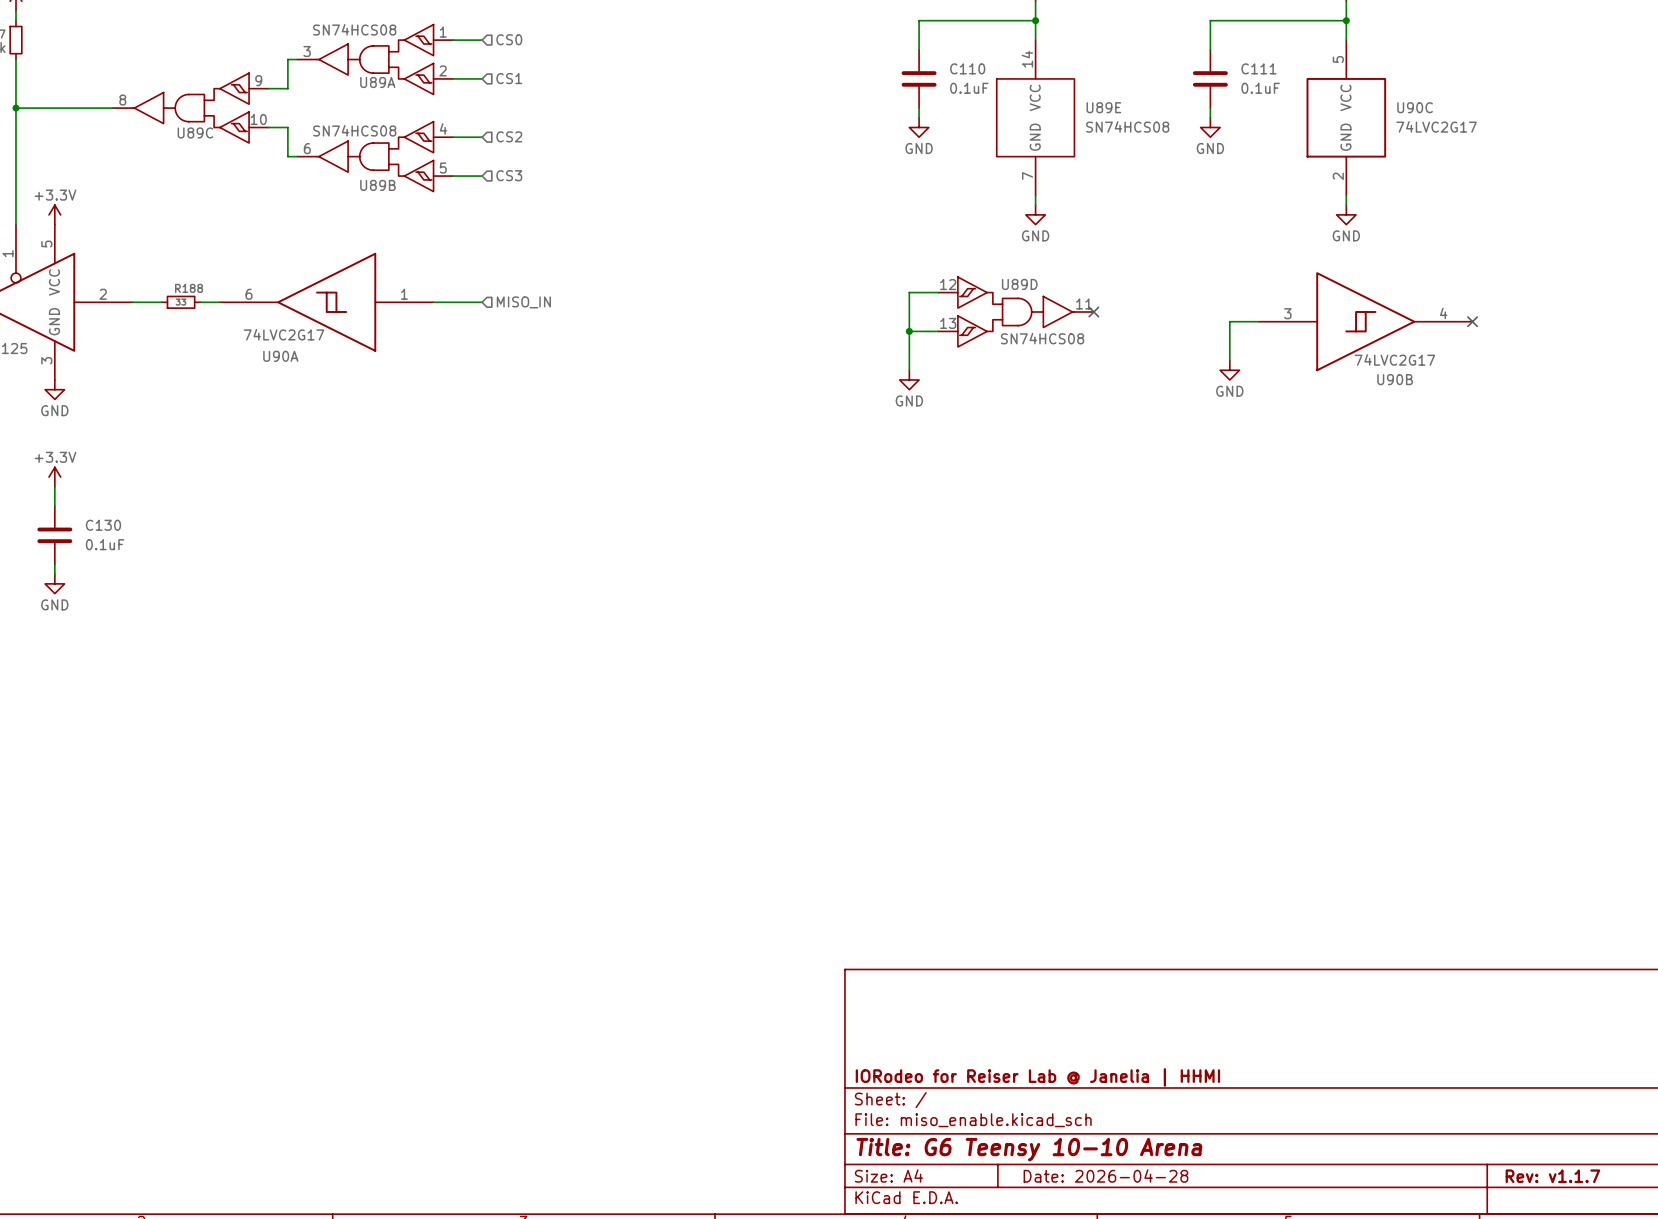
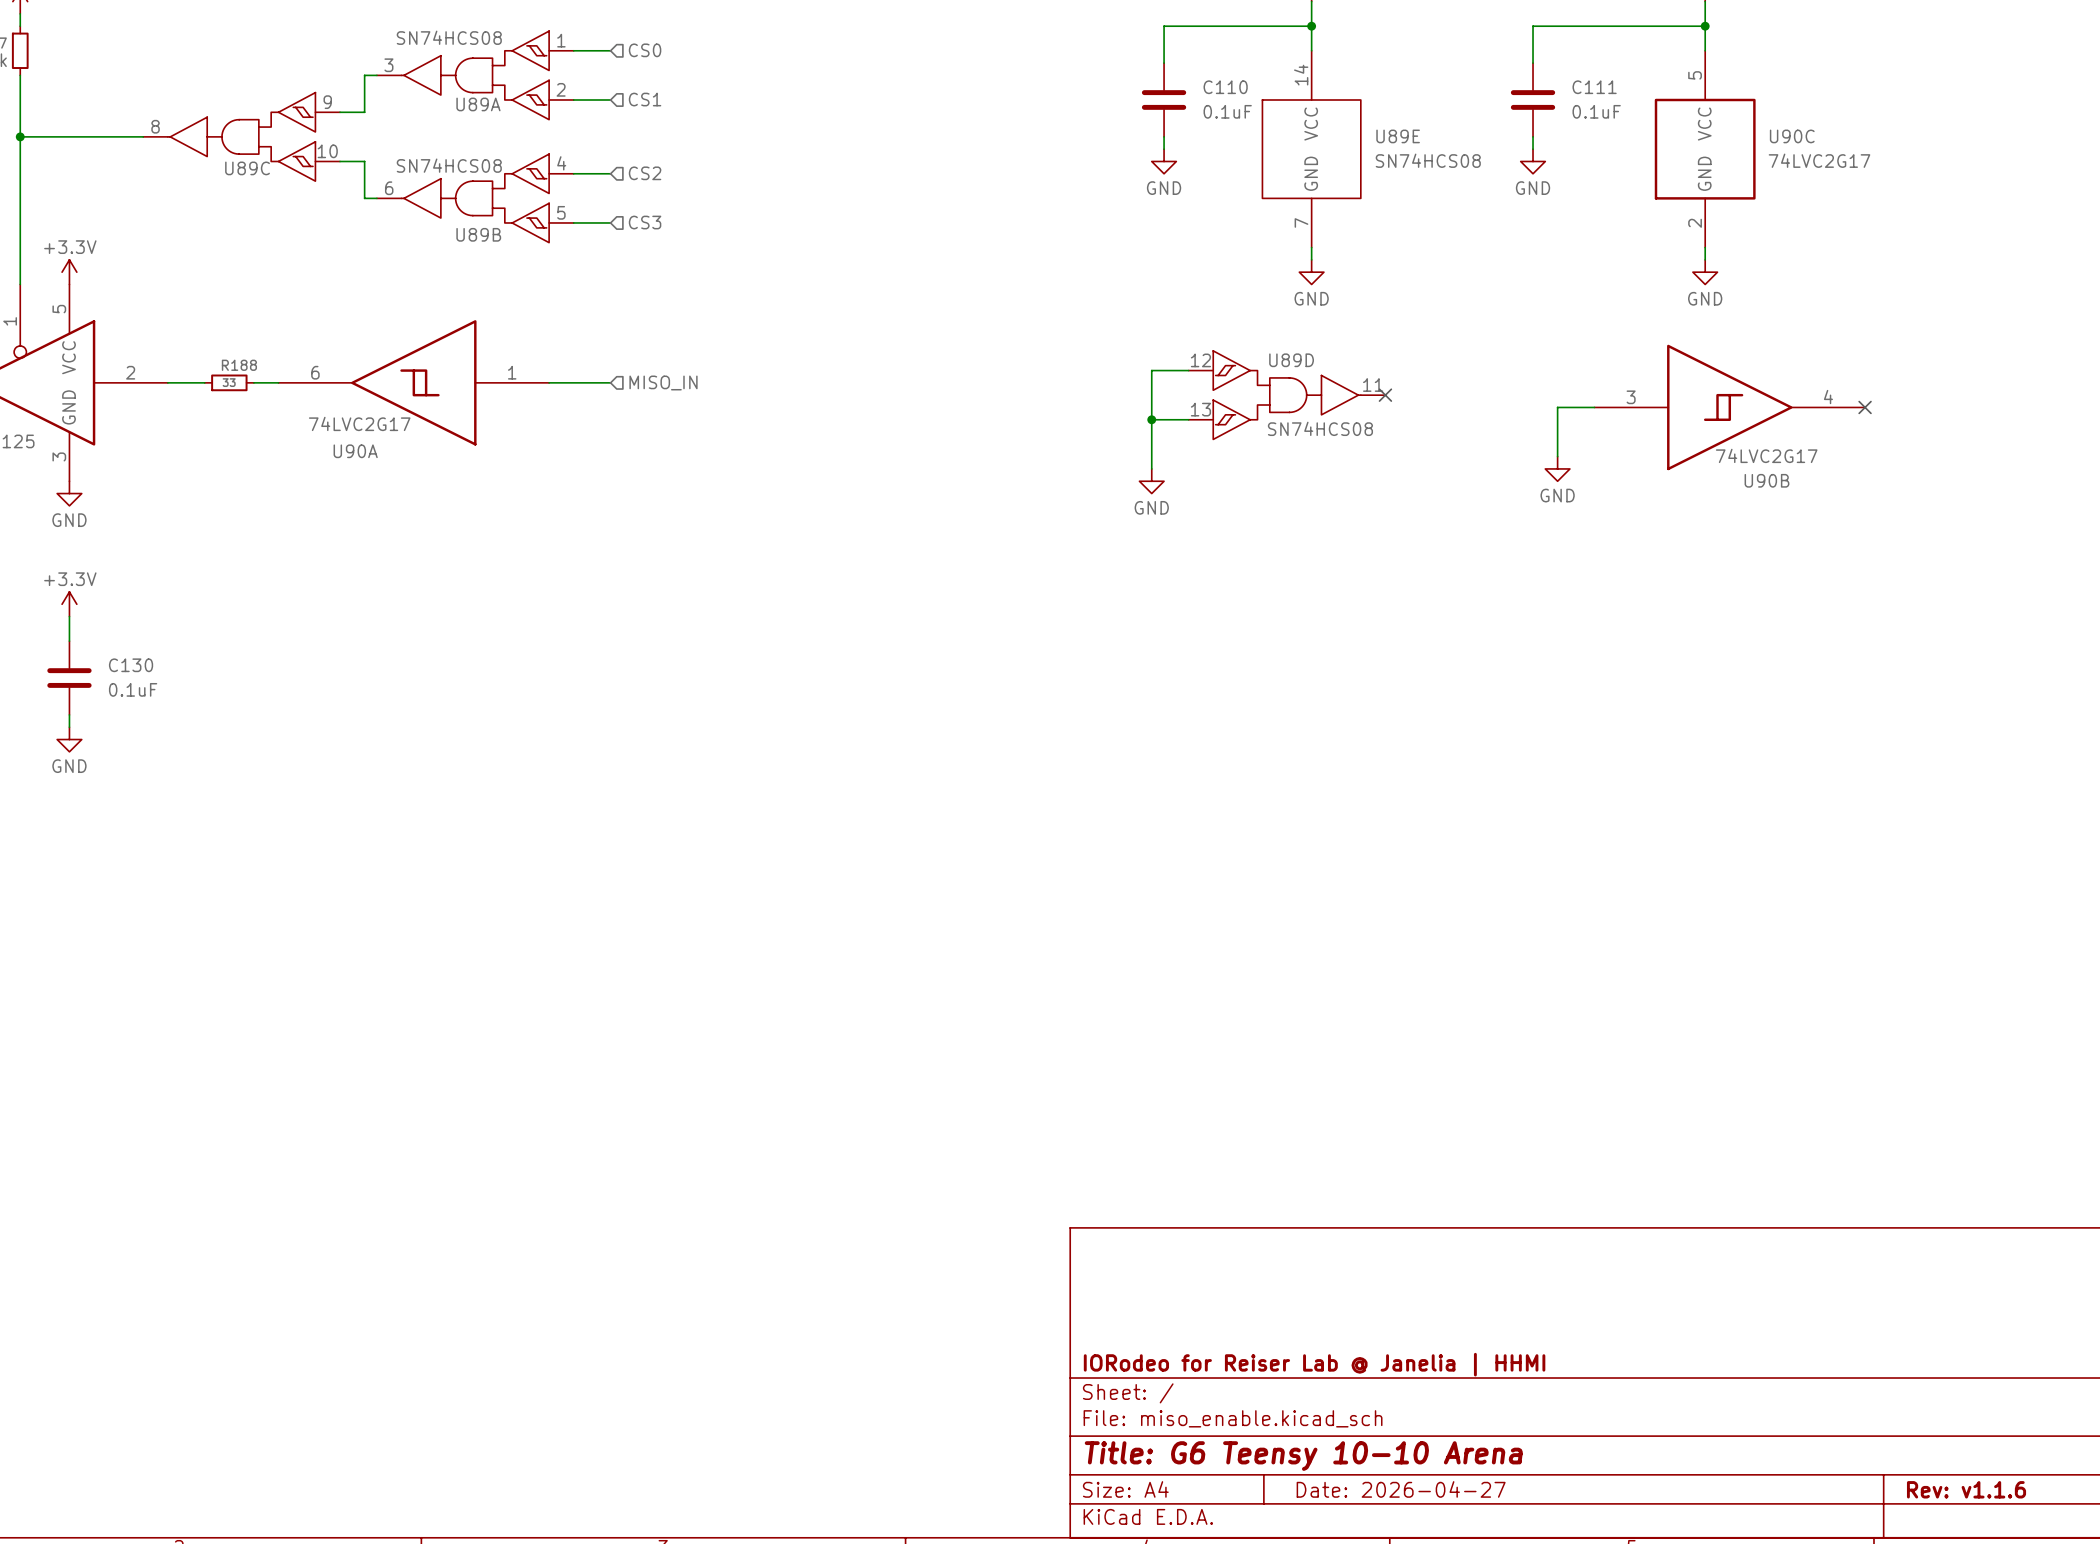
title block: Date: 2026-04-28 (1105, 1175) -> Date: 2026-04-27 (1401, 1489)
title block: Rev: v1.1.7 (1552, 1176) -> Rev: v1.1.6 (1966, 1489)

